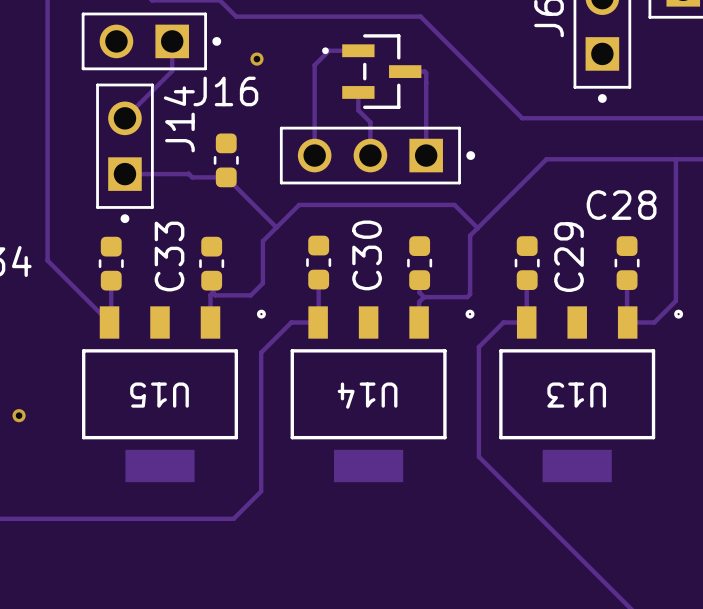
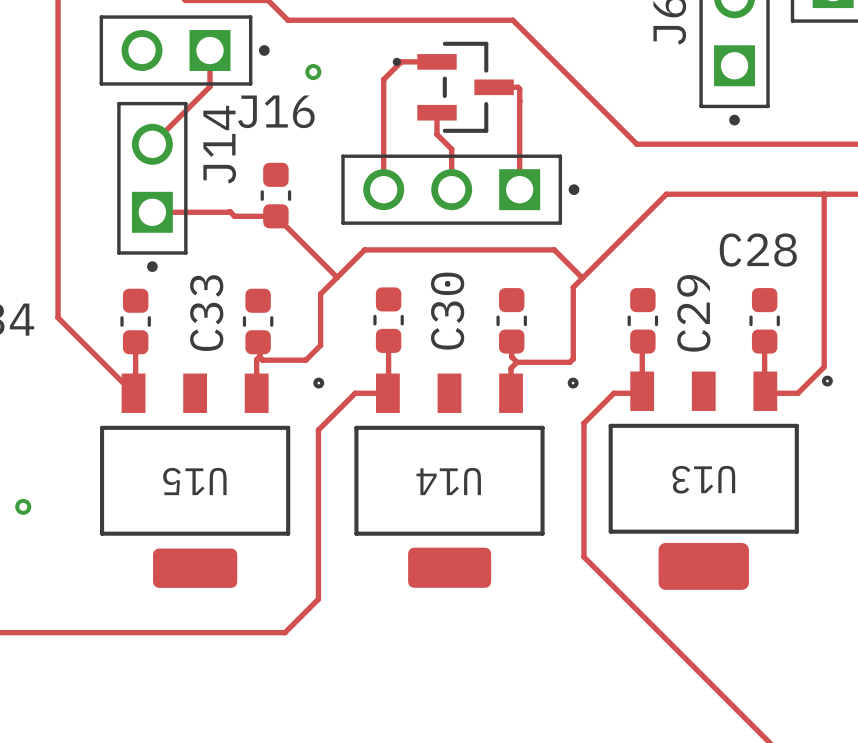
U15 footprint: [82, 306, 266, 483] -> [100, 373, 325, 588]
U14 footprint: [290, 306, 475, 483] -> [354, 373, 579, 588]
U13 footprint: [499, 306, 684, 483] -> [608, 371, 833, 590]

